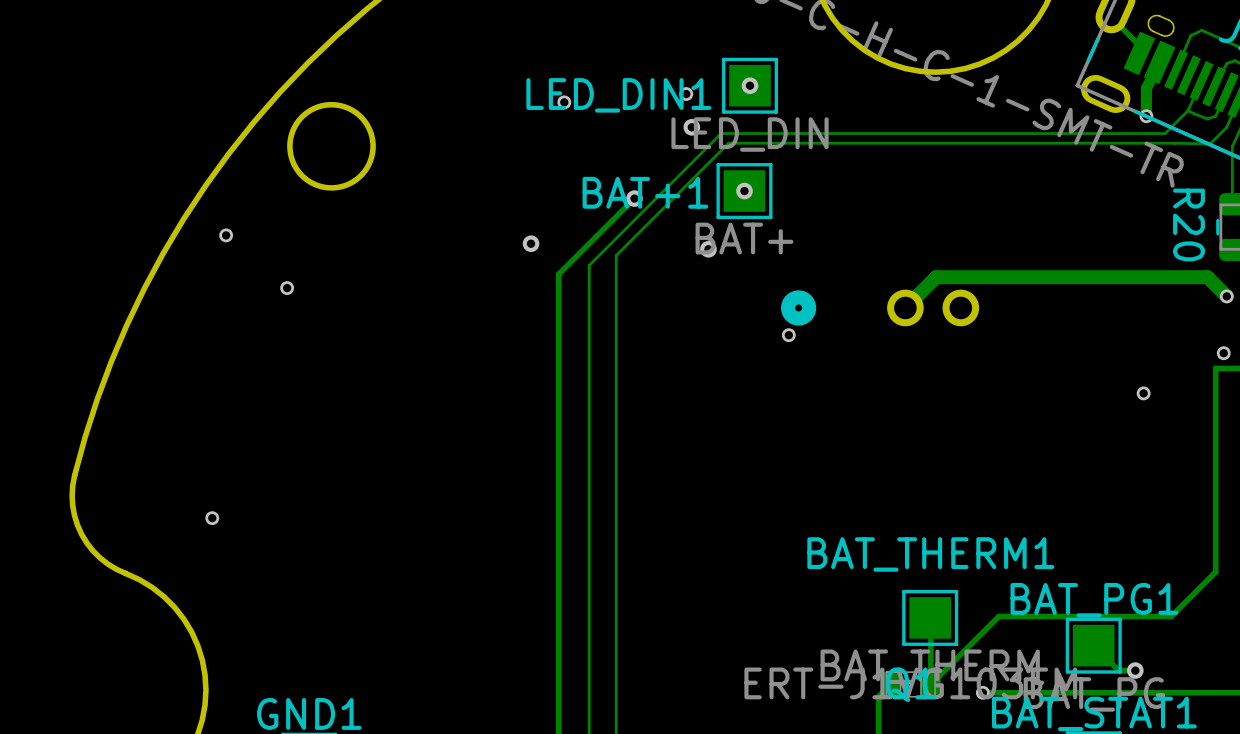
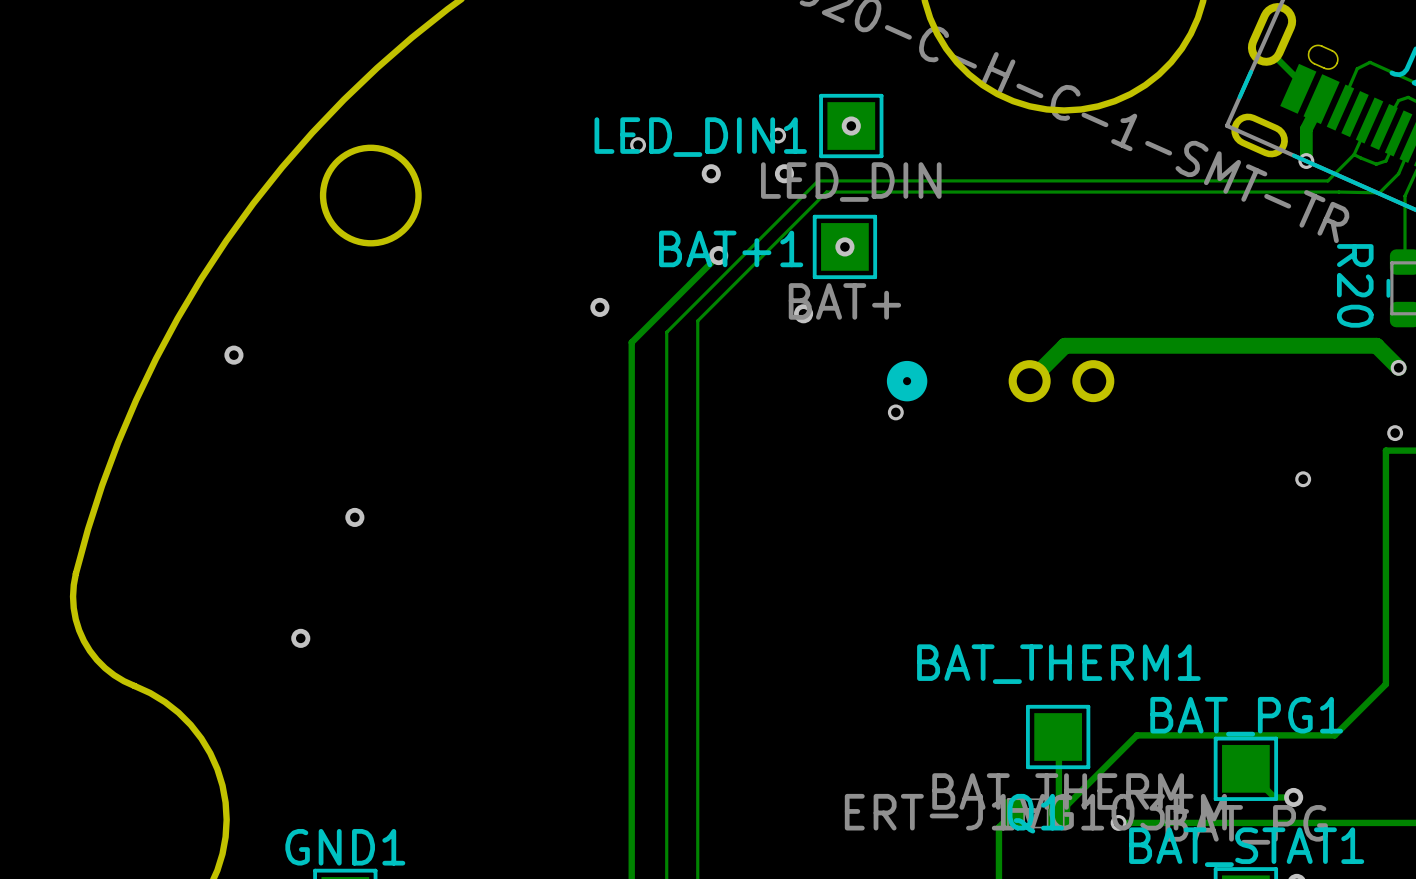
via: none -> (711, 173)
via: (226, 235) -> none
via: none -> (233, 355)
via: (287, 288) -> none
via: none -> (354, 517)
via: (212, 518) -> none
via: none -> (300, 638)

